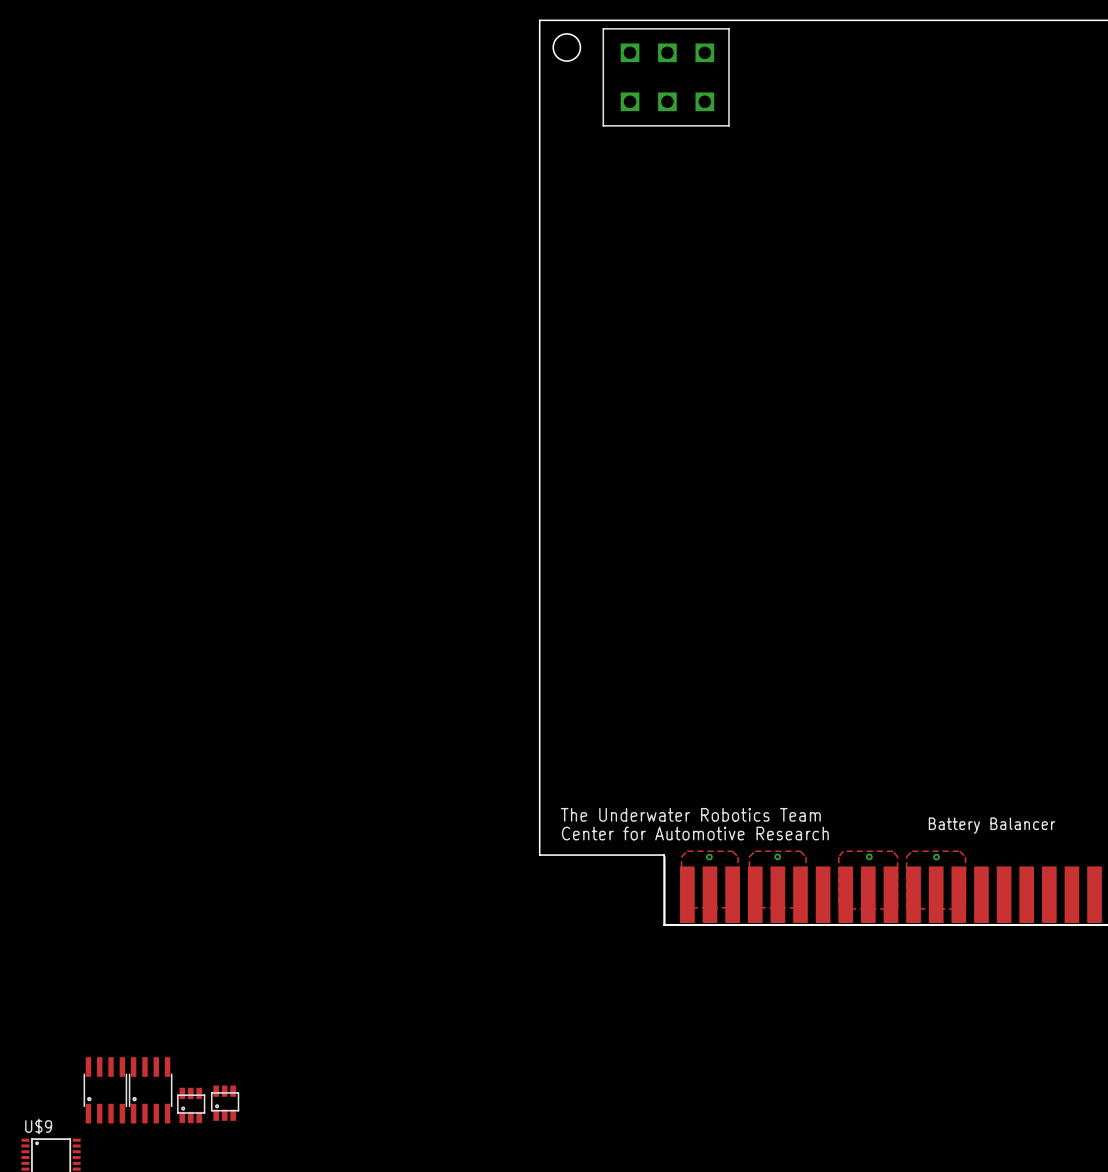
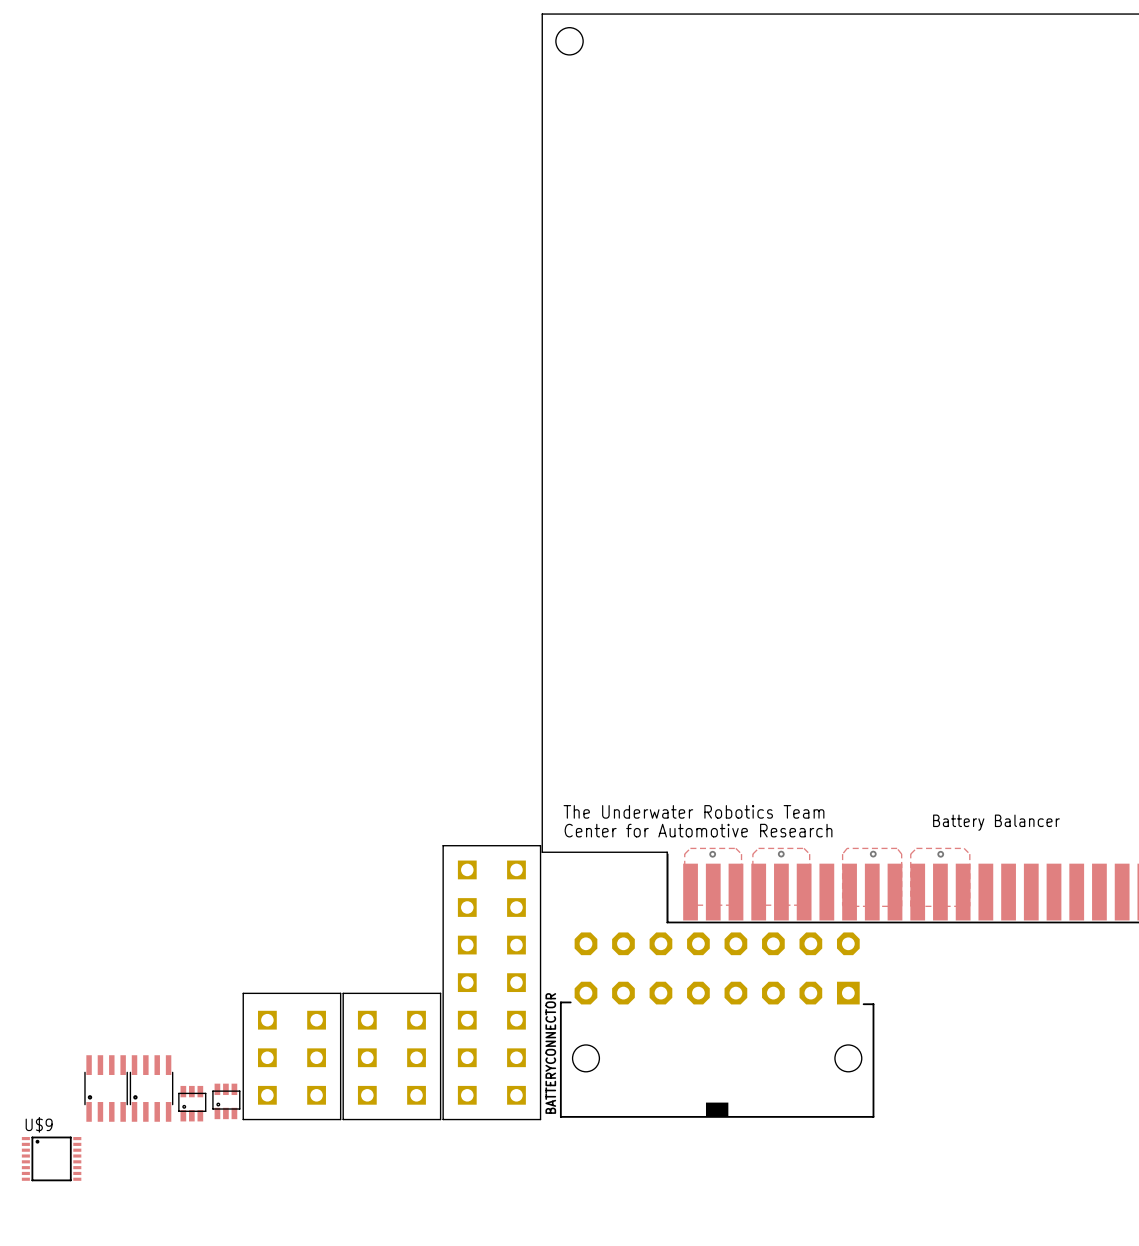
part: (666, 77) -> none
part: none -> (491, 982)
BATTERYCONNECTOR: none -> (717, 1025)
part: none -> (291, 1056)
part: none -> (391, 1056)

